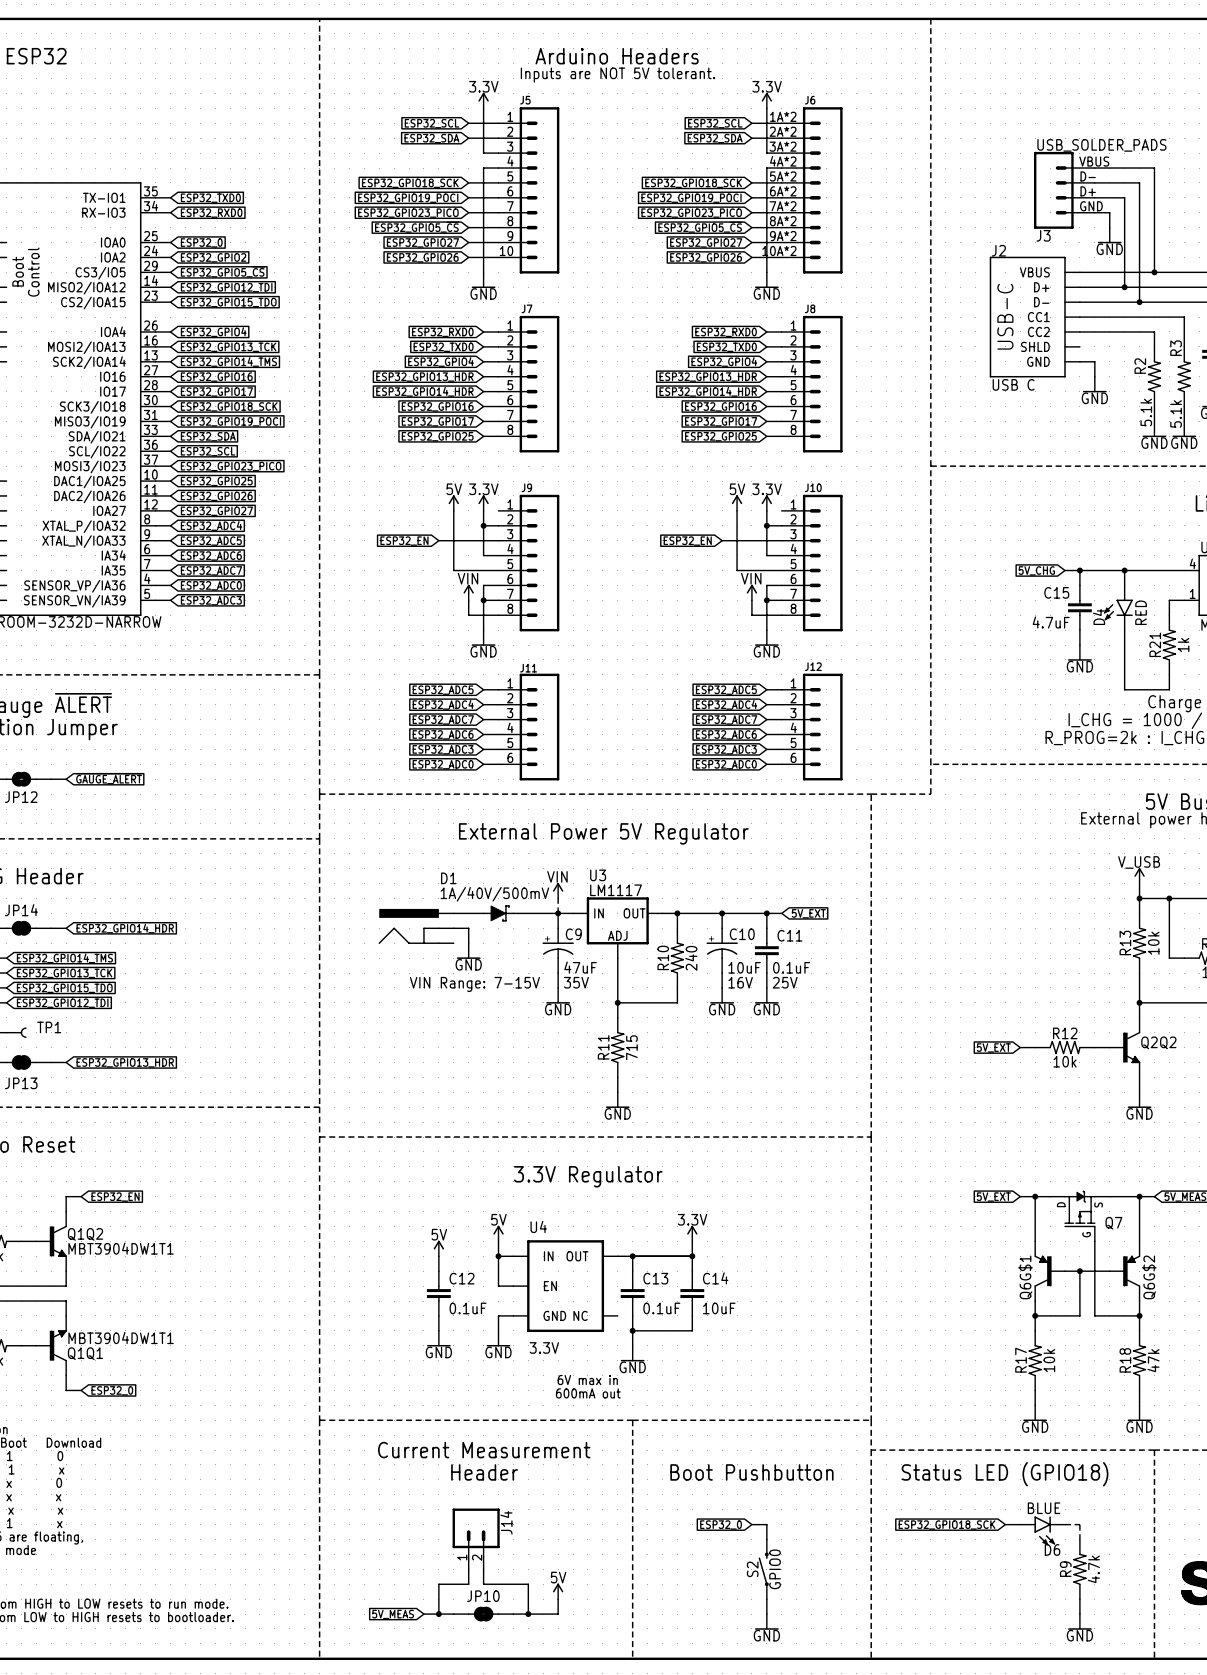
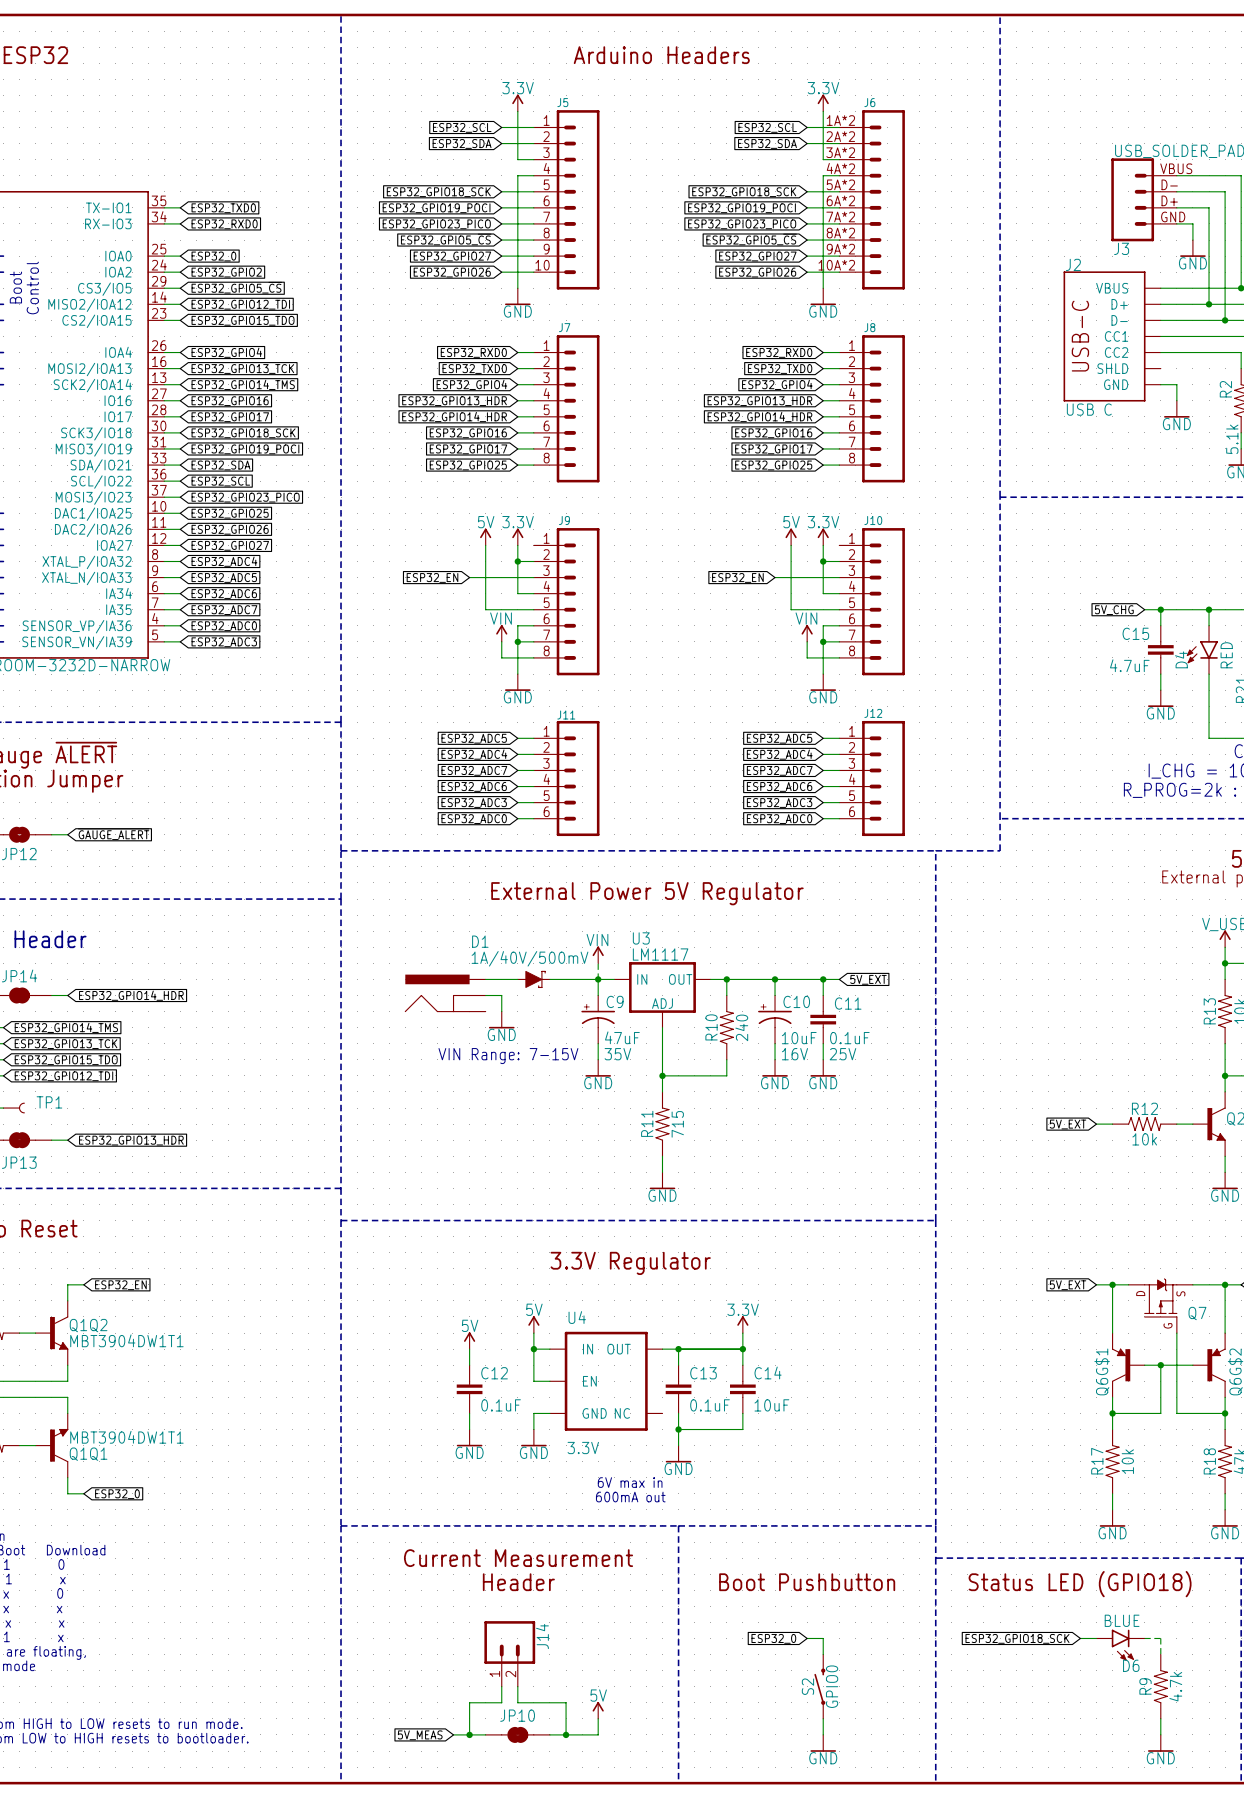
text: Inputs are NOT 5V tolerant. (617, 75) -> none

